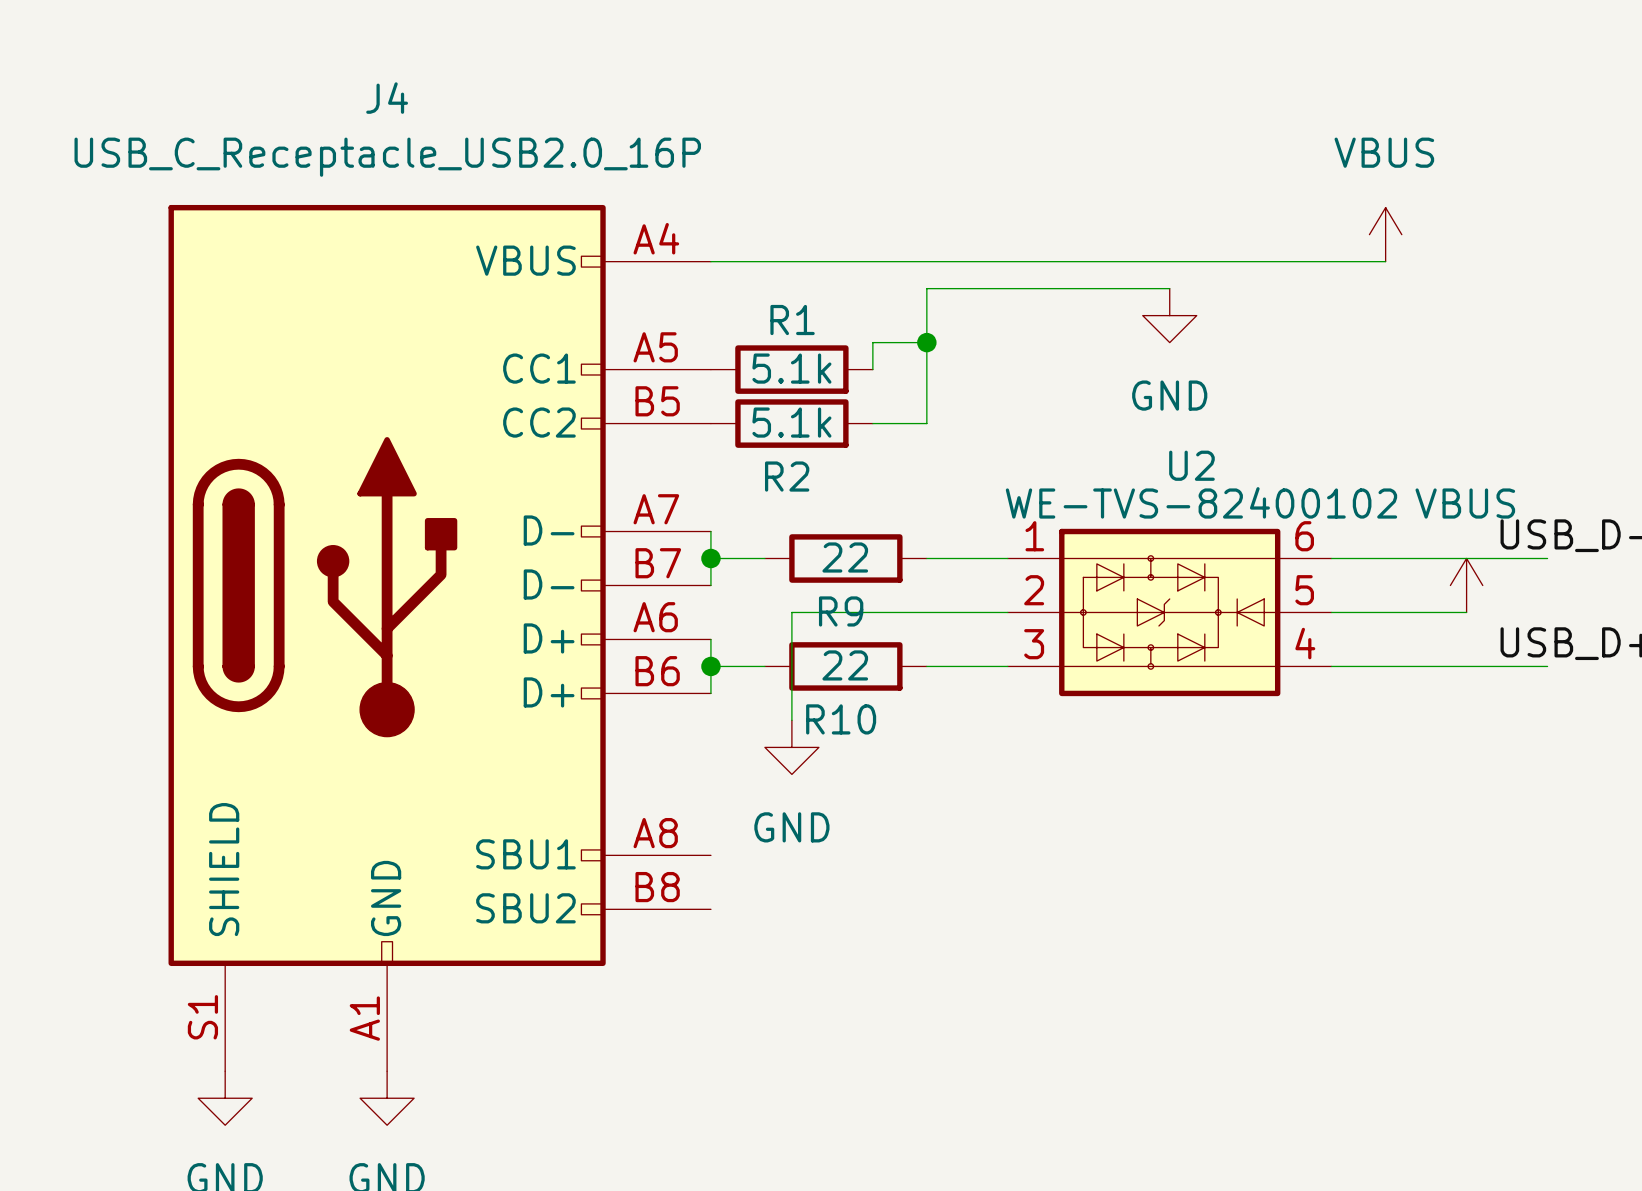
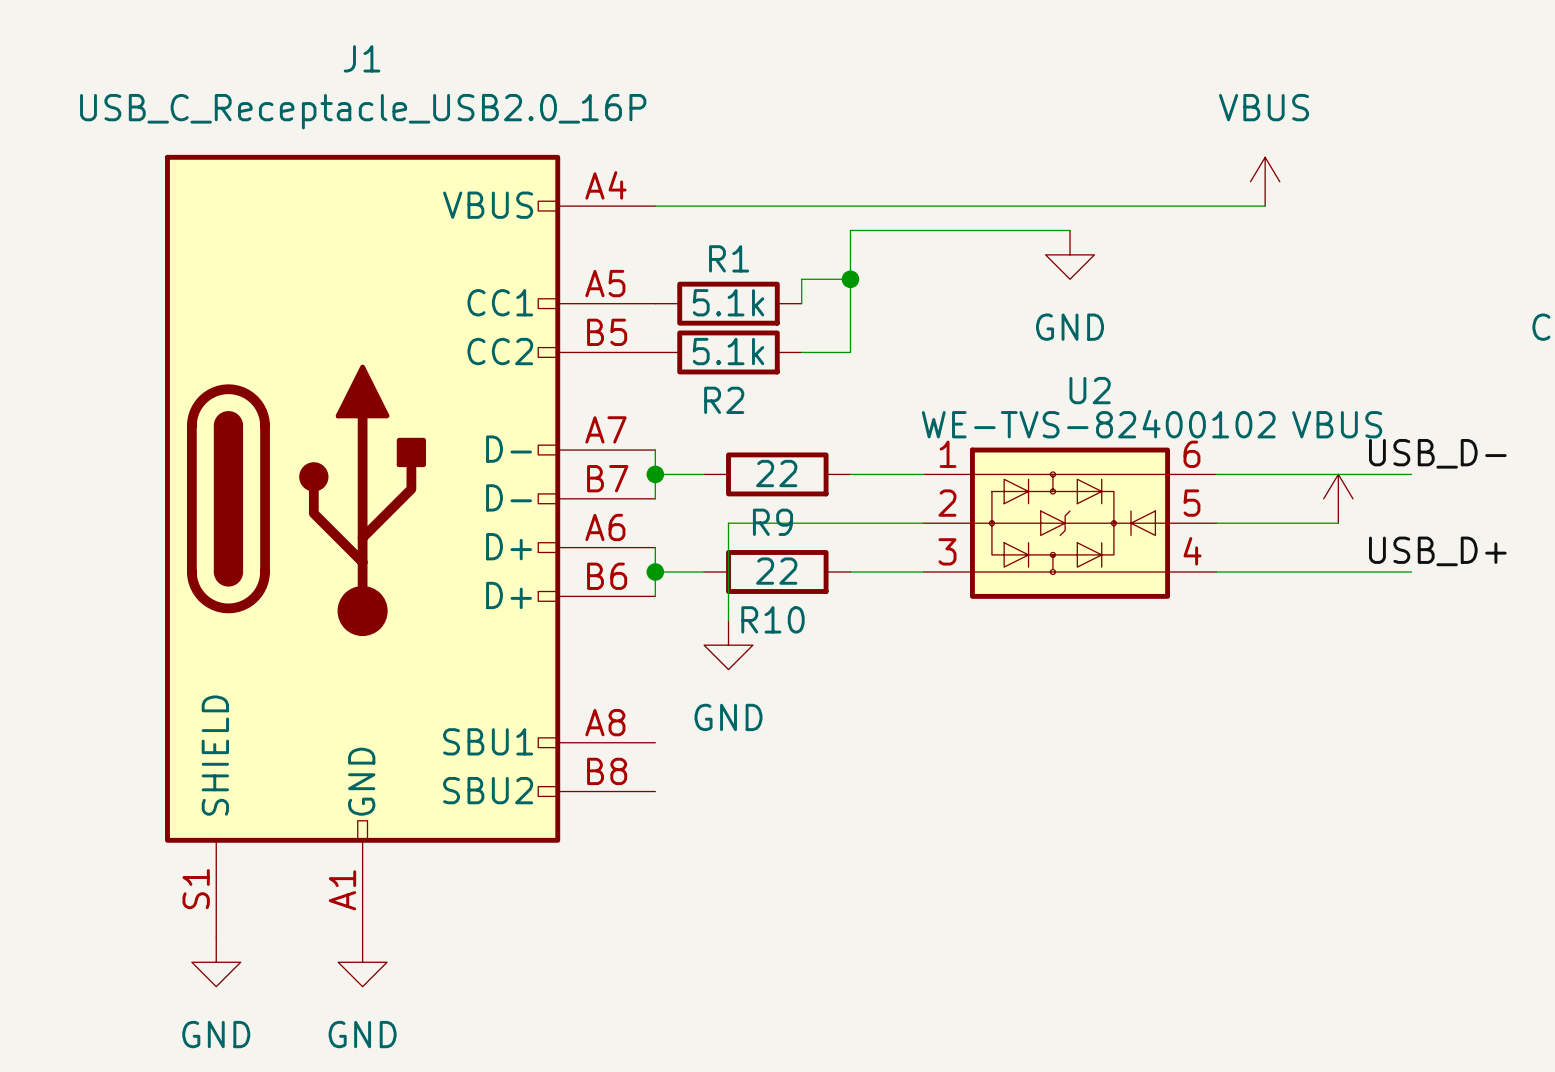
J4 name: J4 (387, 98) -> J1 (362, 58)

